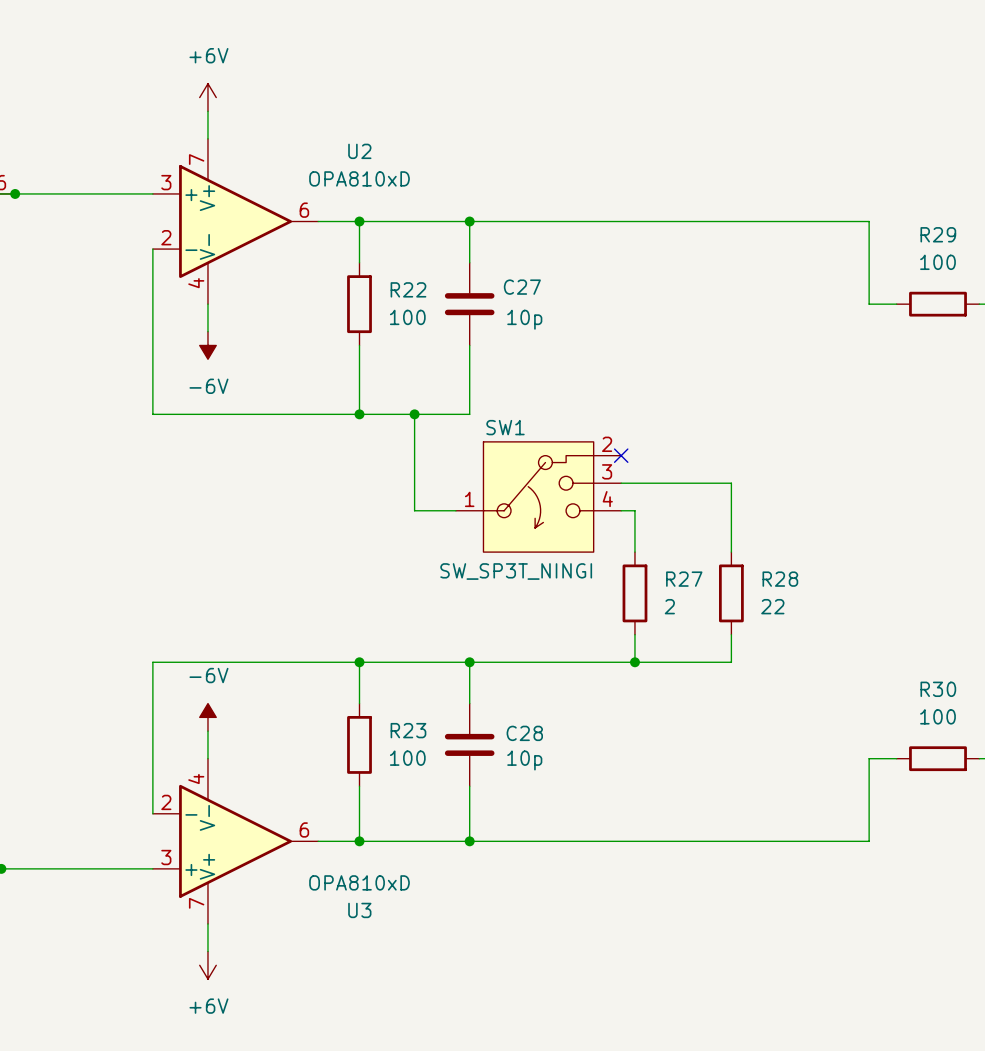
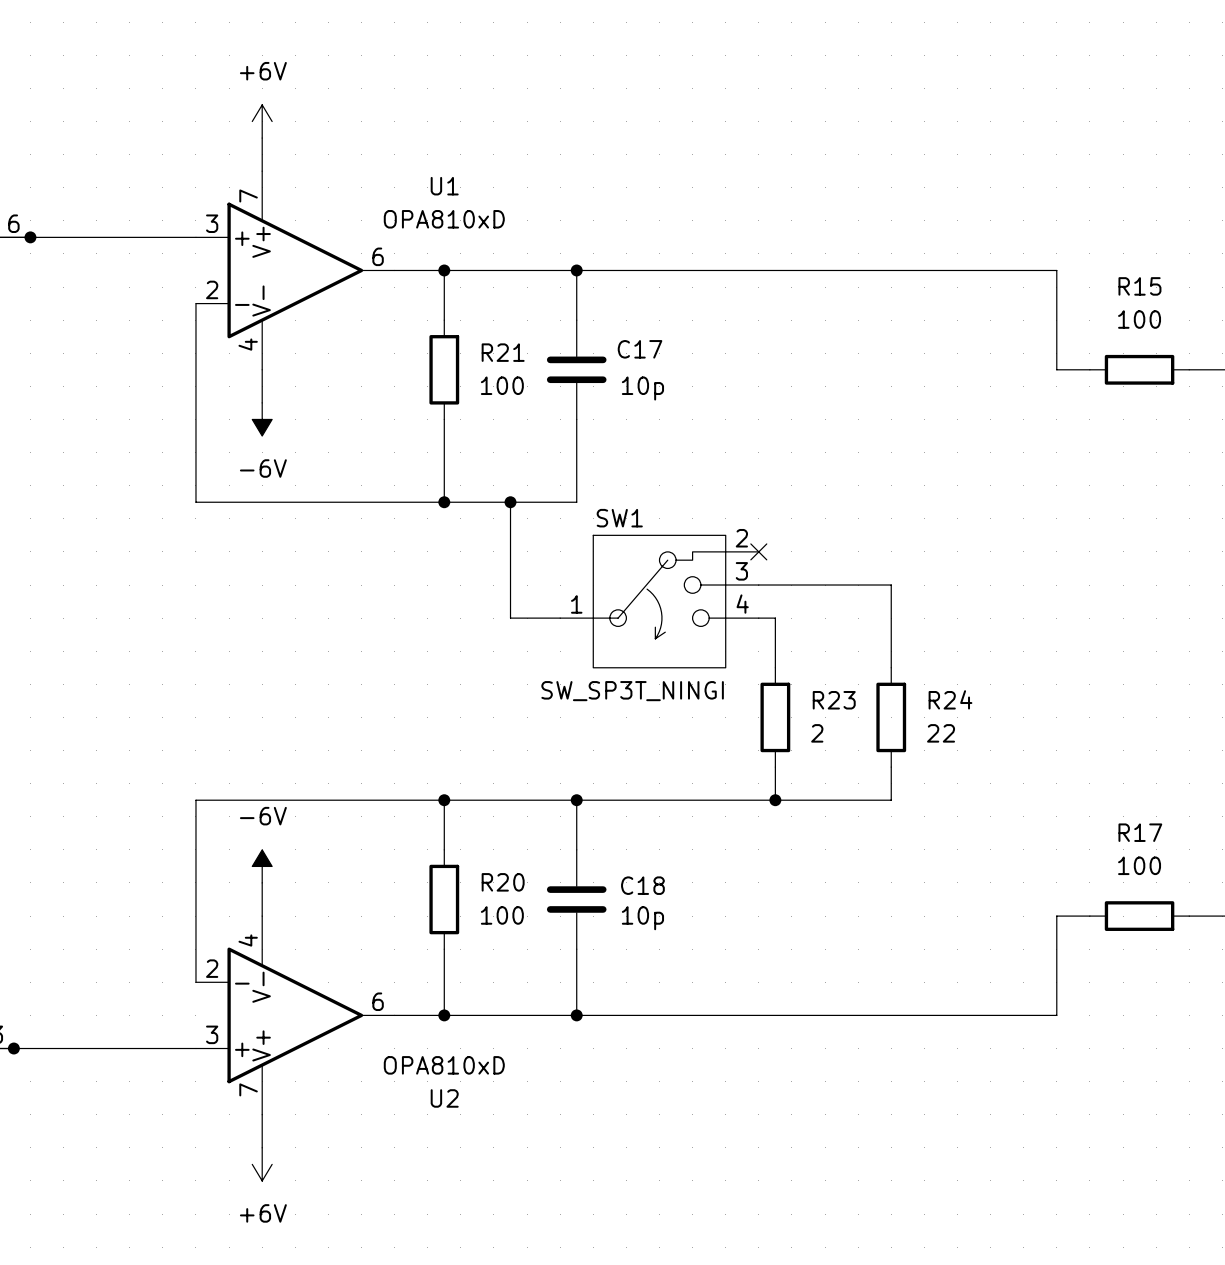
U2 name: U2 (359, 151) -> U1 (444, 186)
R29 name: R29 (938, 234) -> R15 (1139, 286)
C27 name: C27 (522, 287) -> C17 (640, 349)
R22 name: R22 (408, 289) -> R21 (503, 352)
R27 name: R27 (684, 579) -> R23 (834, 700)
R28 name: R28 (780, 579) -> R24 (950, 699)
R30 name: R30 (938, 689) -> R17 (1140, 832)
R23 name: R23 (408, 730) -> R20 (503, 882)
C28 name: C28 (524, 733) -> C18 (642, 885)
U3 name: U3 (359, 910) -> U2 (444, 1098)

